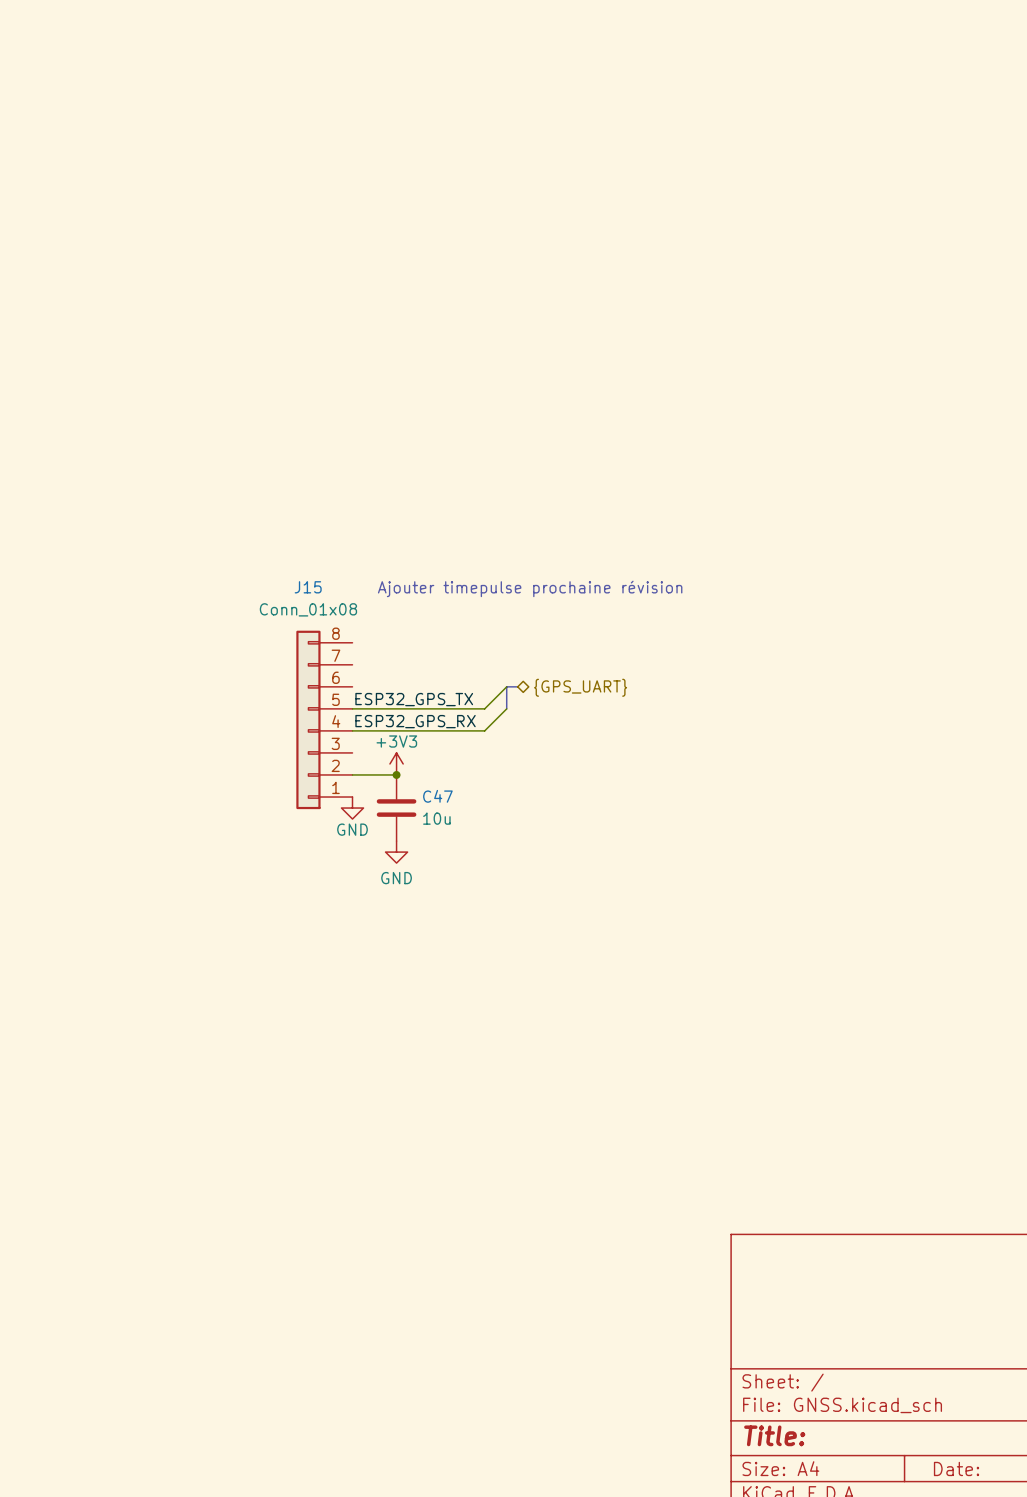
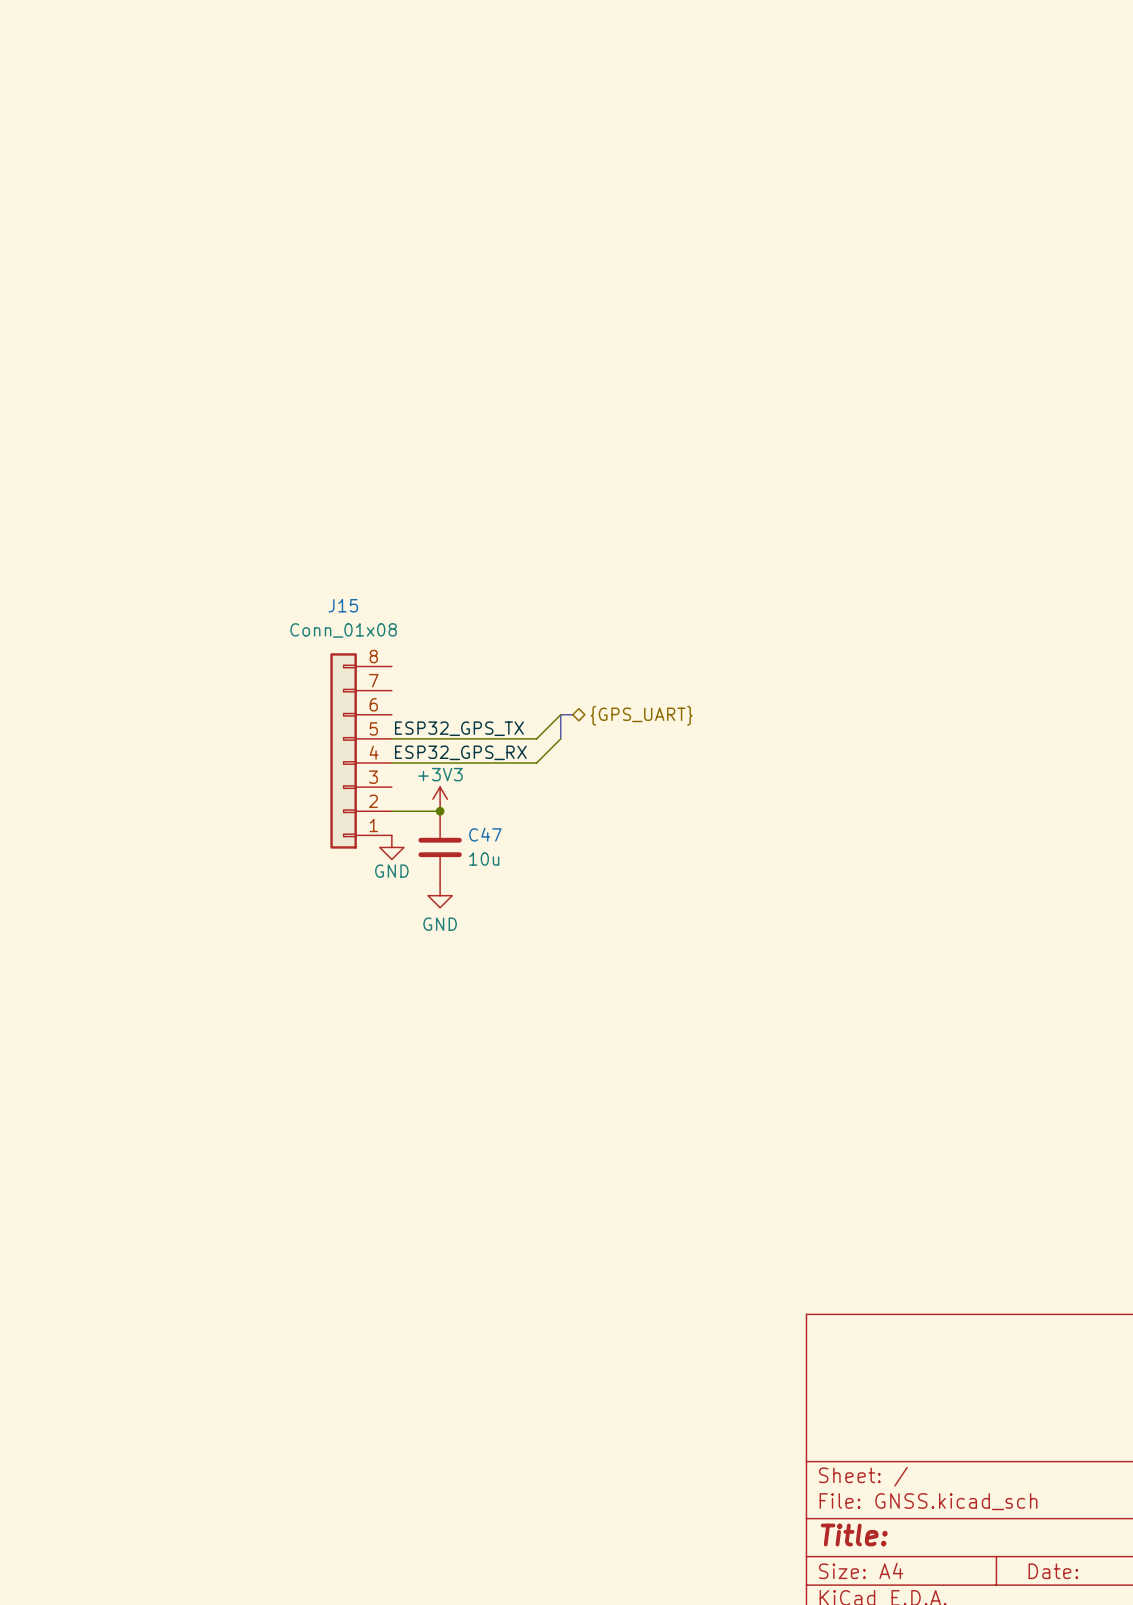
text: Ajouter timepulse prochaine révision (530, 588) -> none

